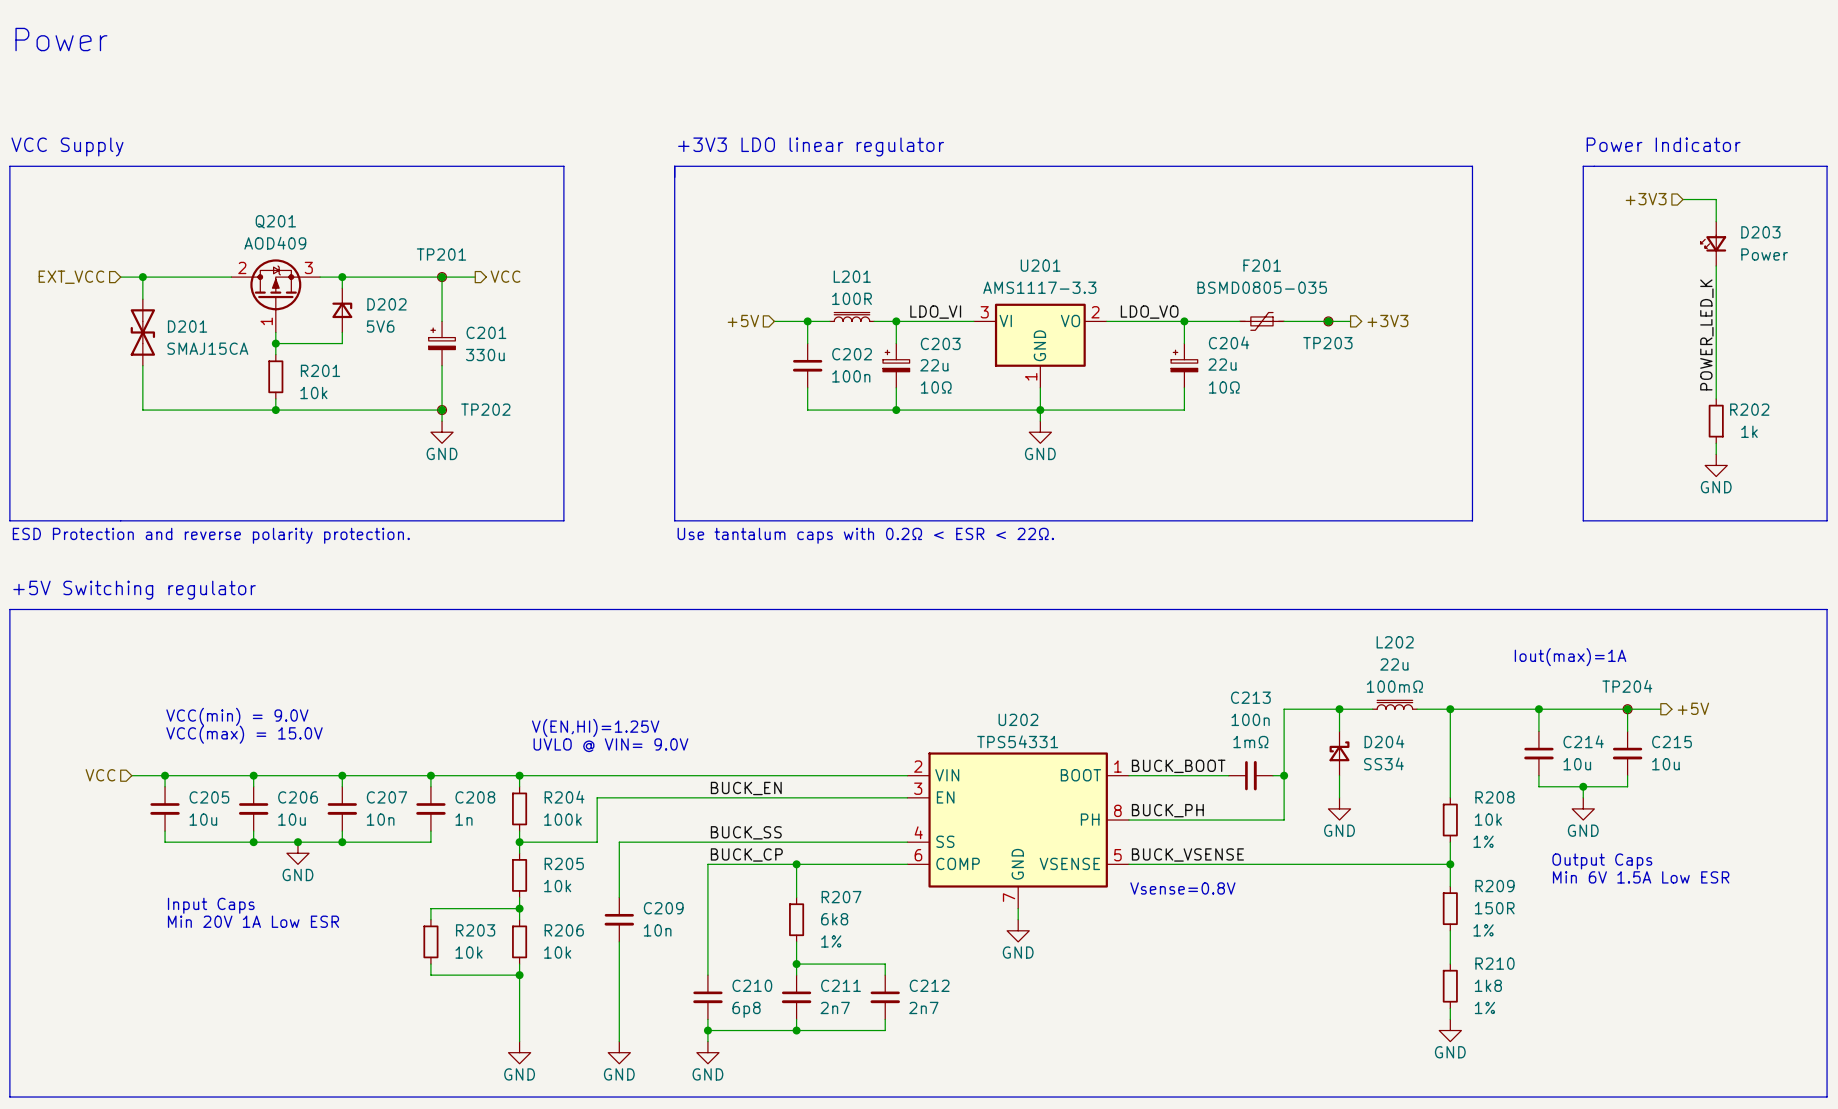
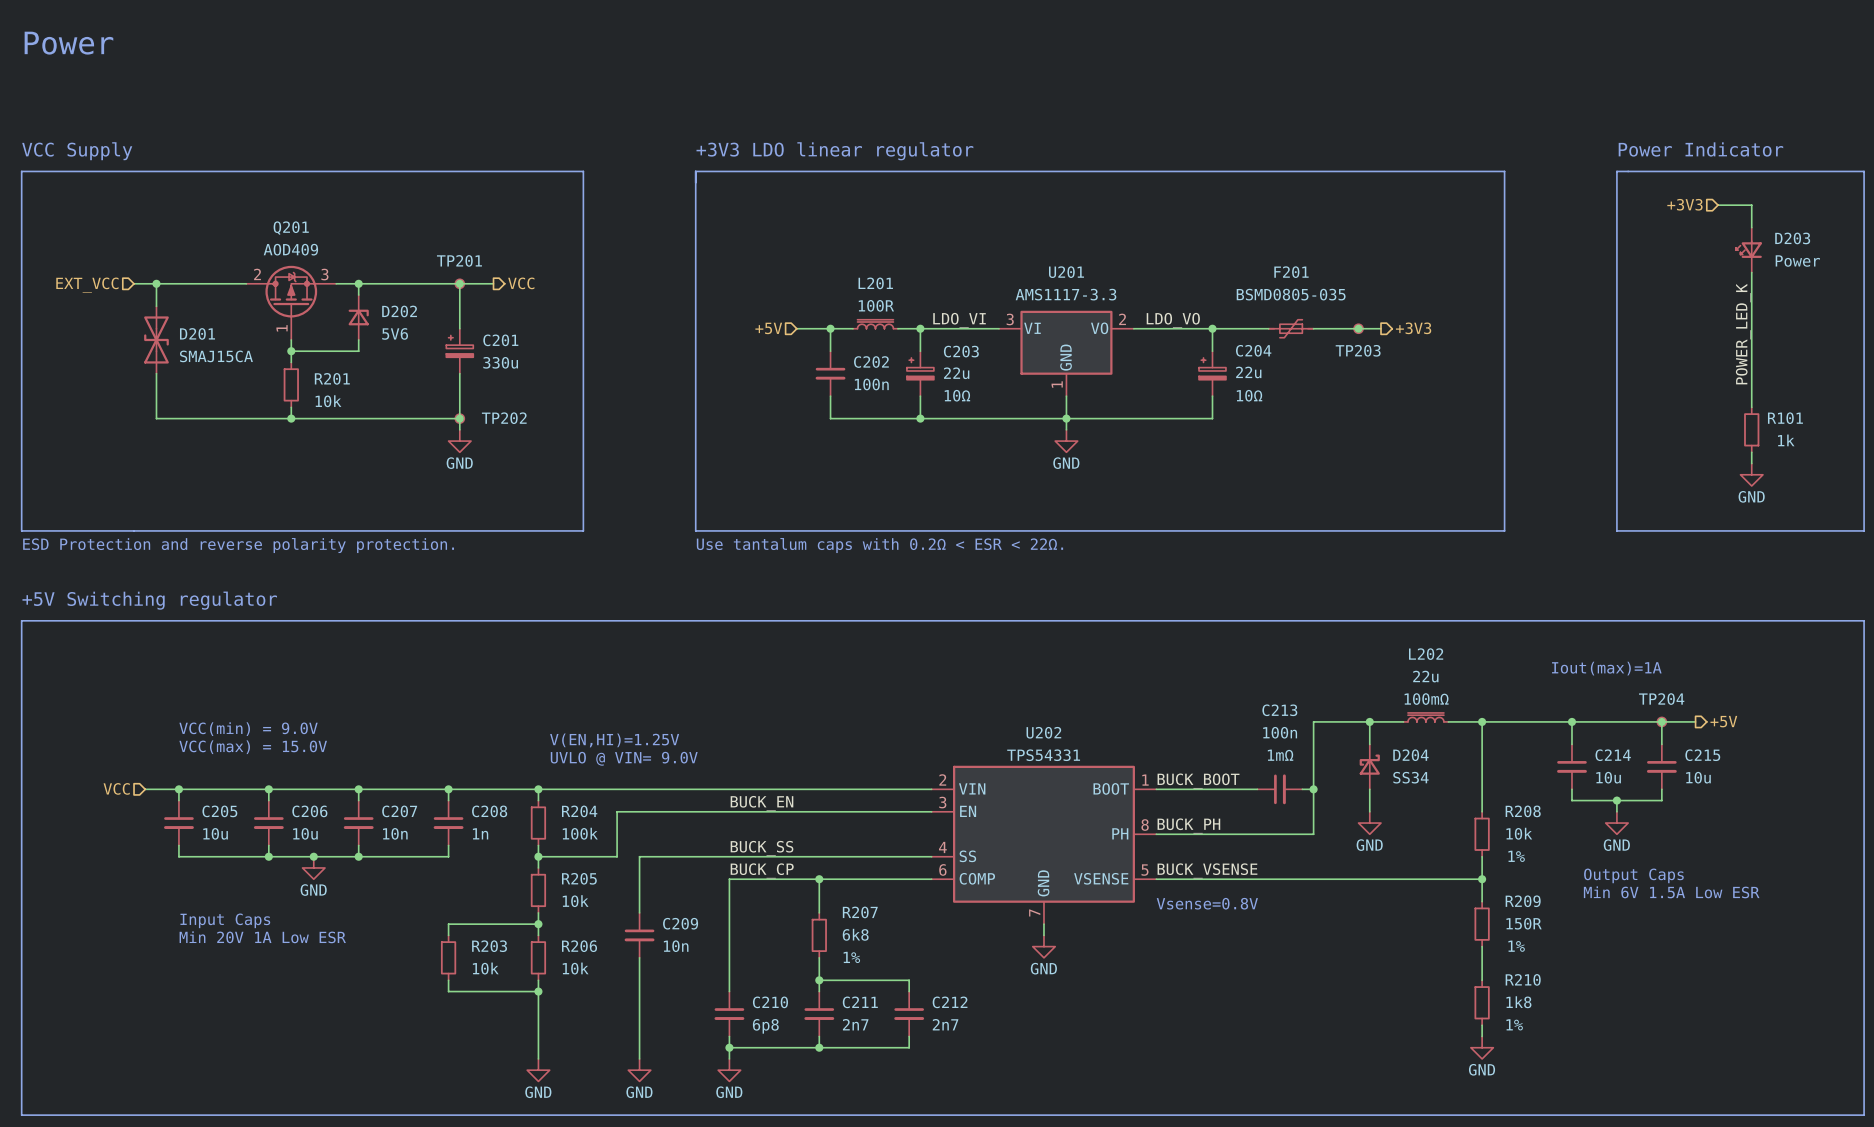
R202 name: R202 (1749, 409) -> R101 (1785, 418)

